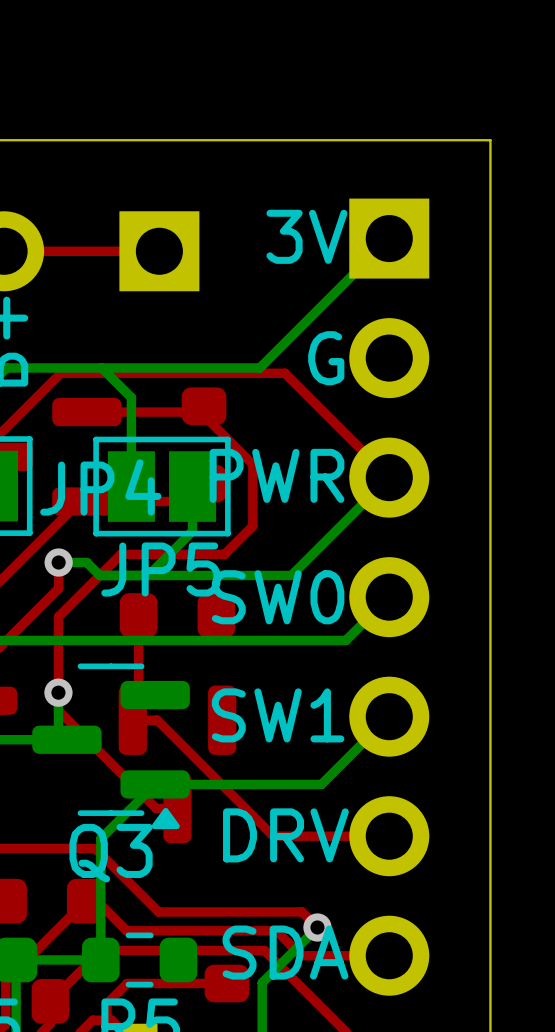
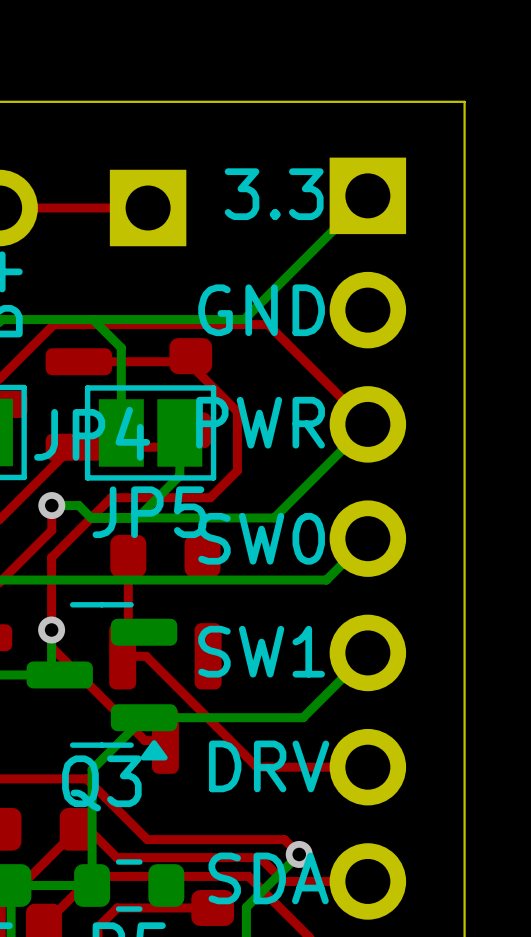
text: 3V (306, 236) -> 3.3 (274, 194)
text: G (326, 358) -> GND (261, 310)

